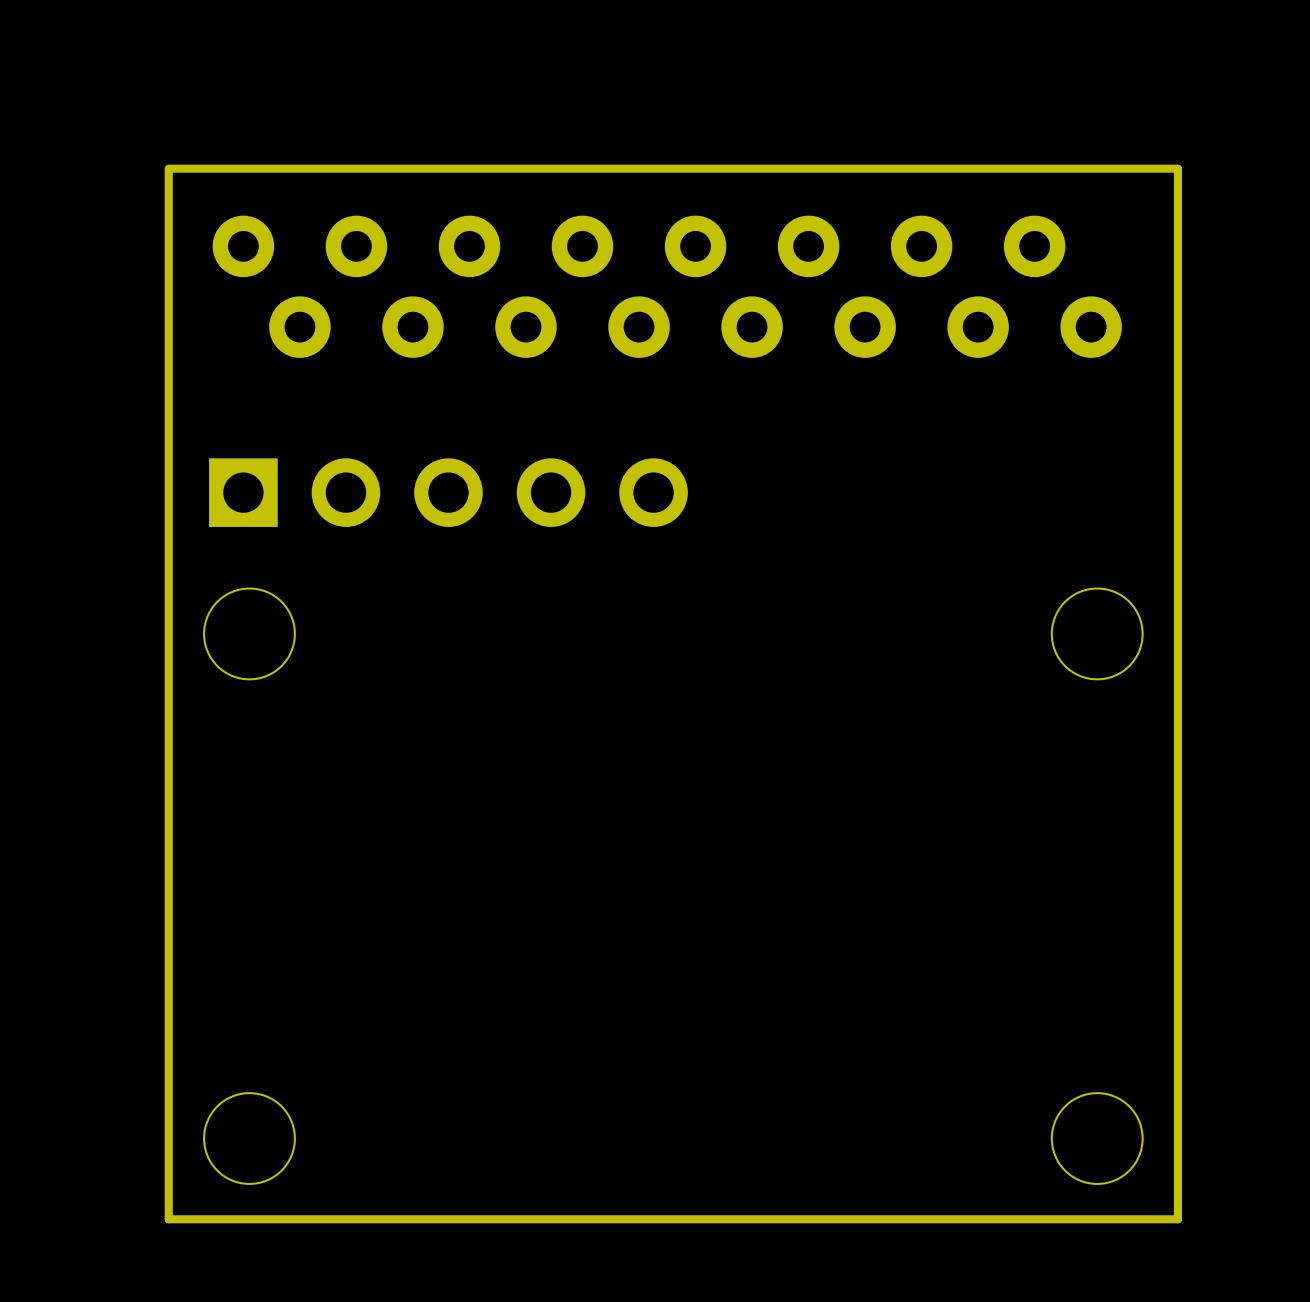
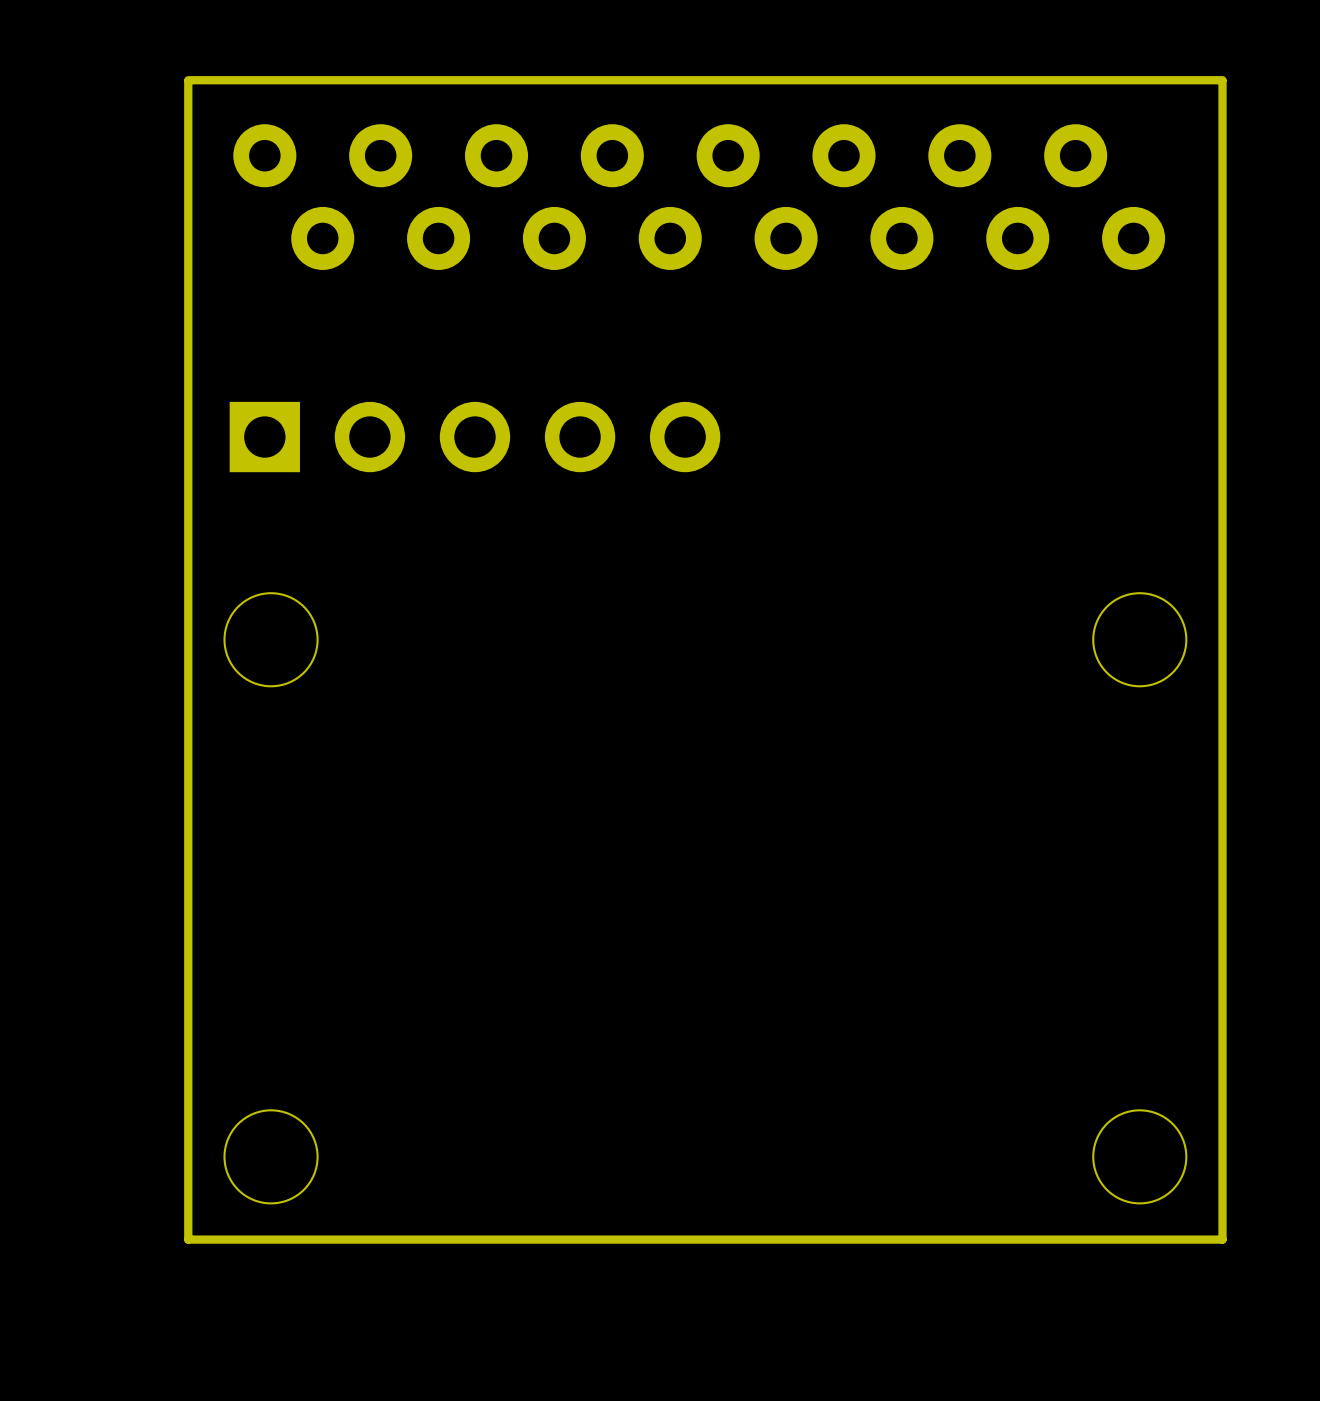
board edge: none -> (1222, 80) (188, 80)
board edge: none -> (188, 81) (188, 163)
board edge: (1177, 168) (168, 168) -> (1222, 163) (1222, 81)
part position: (667, 286) -> (699, 197)
part position: (448, 492) -> (474, 437)

